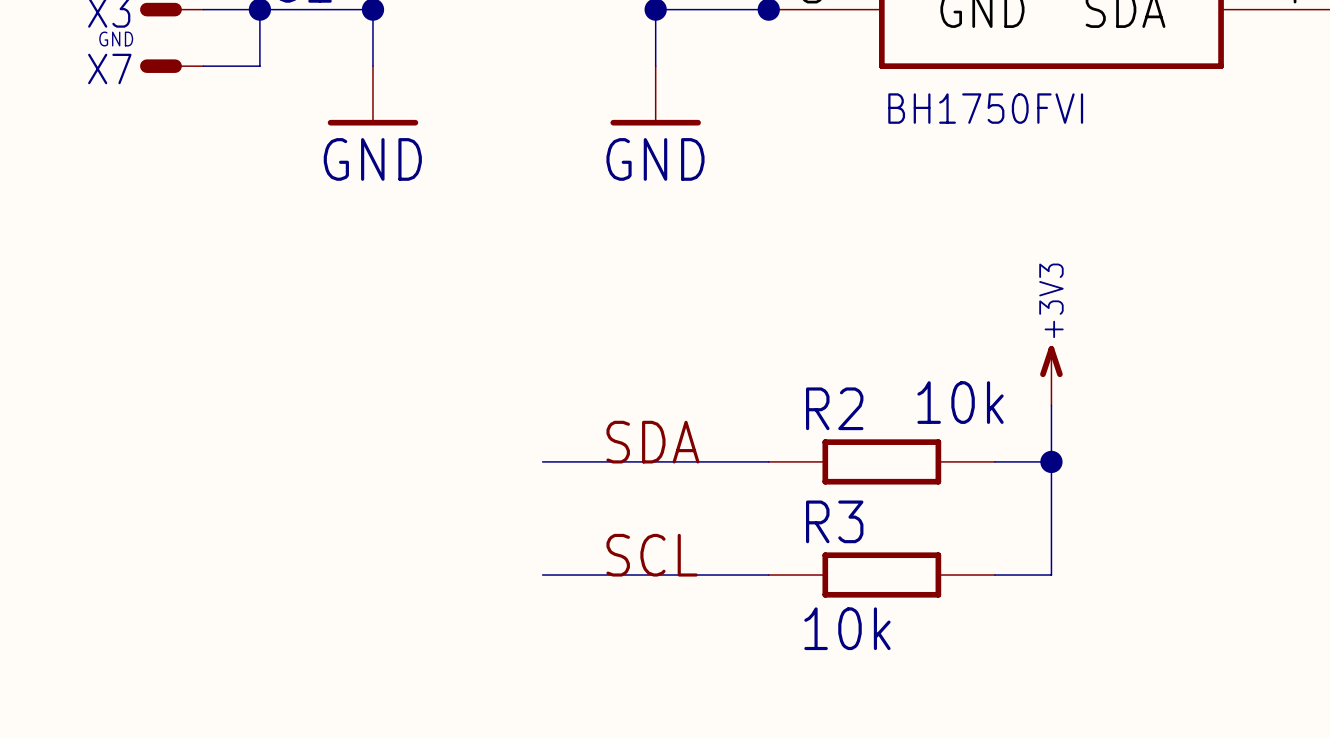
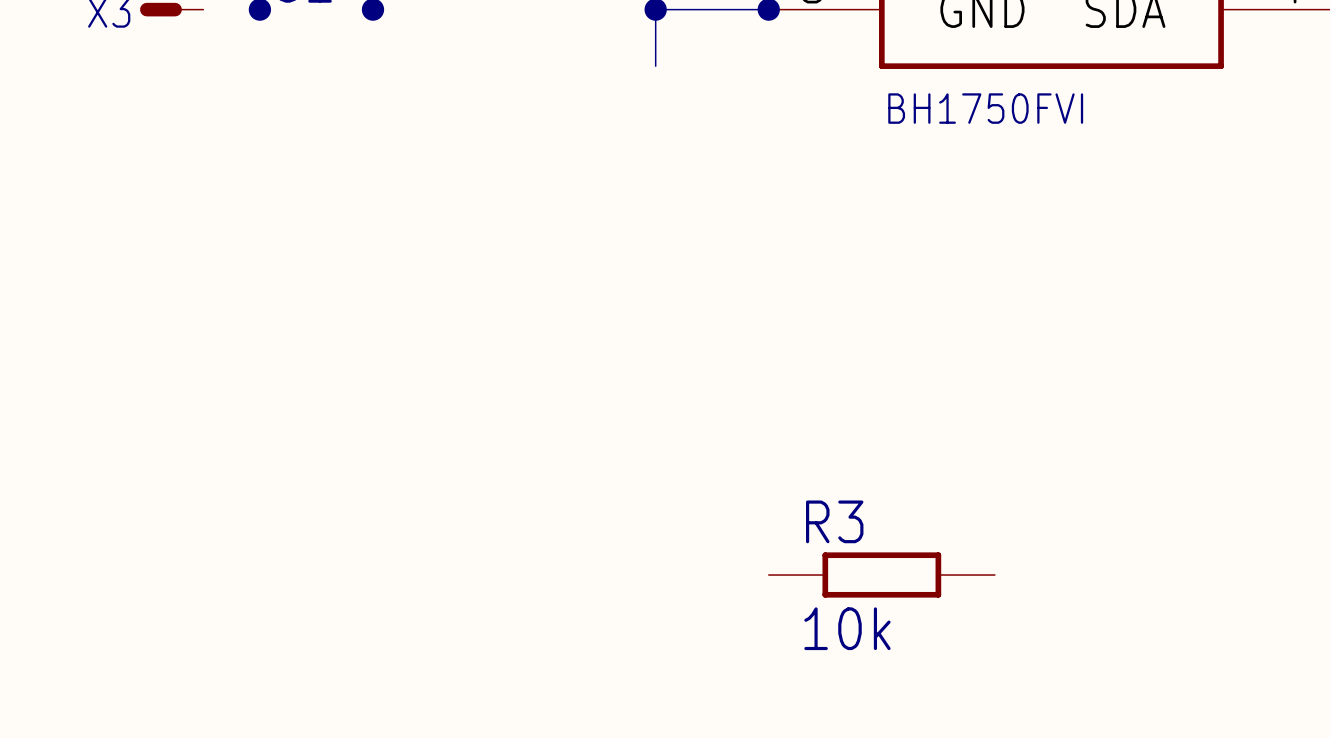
wire: (203, 9) (372, 9) (372, 66) -> none
wire: (259, 9) (259, 66) (203, 66) -> none
X7: GND (171, 66) -> none
power symbol: GND (372, 95) -> none
power symbol: GND (655, 95) -> none
power symbol: +3V3 (1051, 375) -> none
wire: (1051, 405) (1051, 575) (994, 575) -> none
label: SDA (652, 442) -> none
wire: (542, 461) (768, 461) -> none
R2: 10k (881, 461) -> none
wire: (994, 461) (1051, 461) -> none
junction: (1051, 461) -> none
label: SCL (652, 555) -> none
wire: (542, 575) (768, 575) -> none

